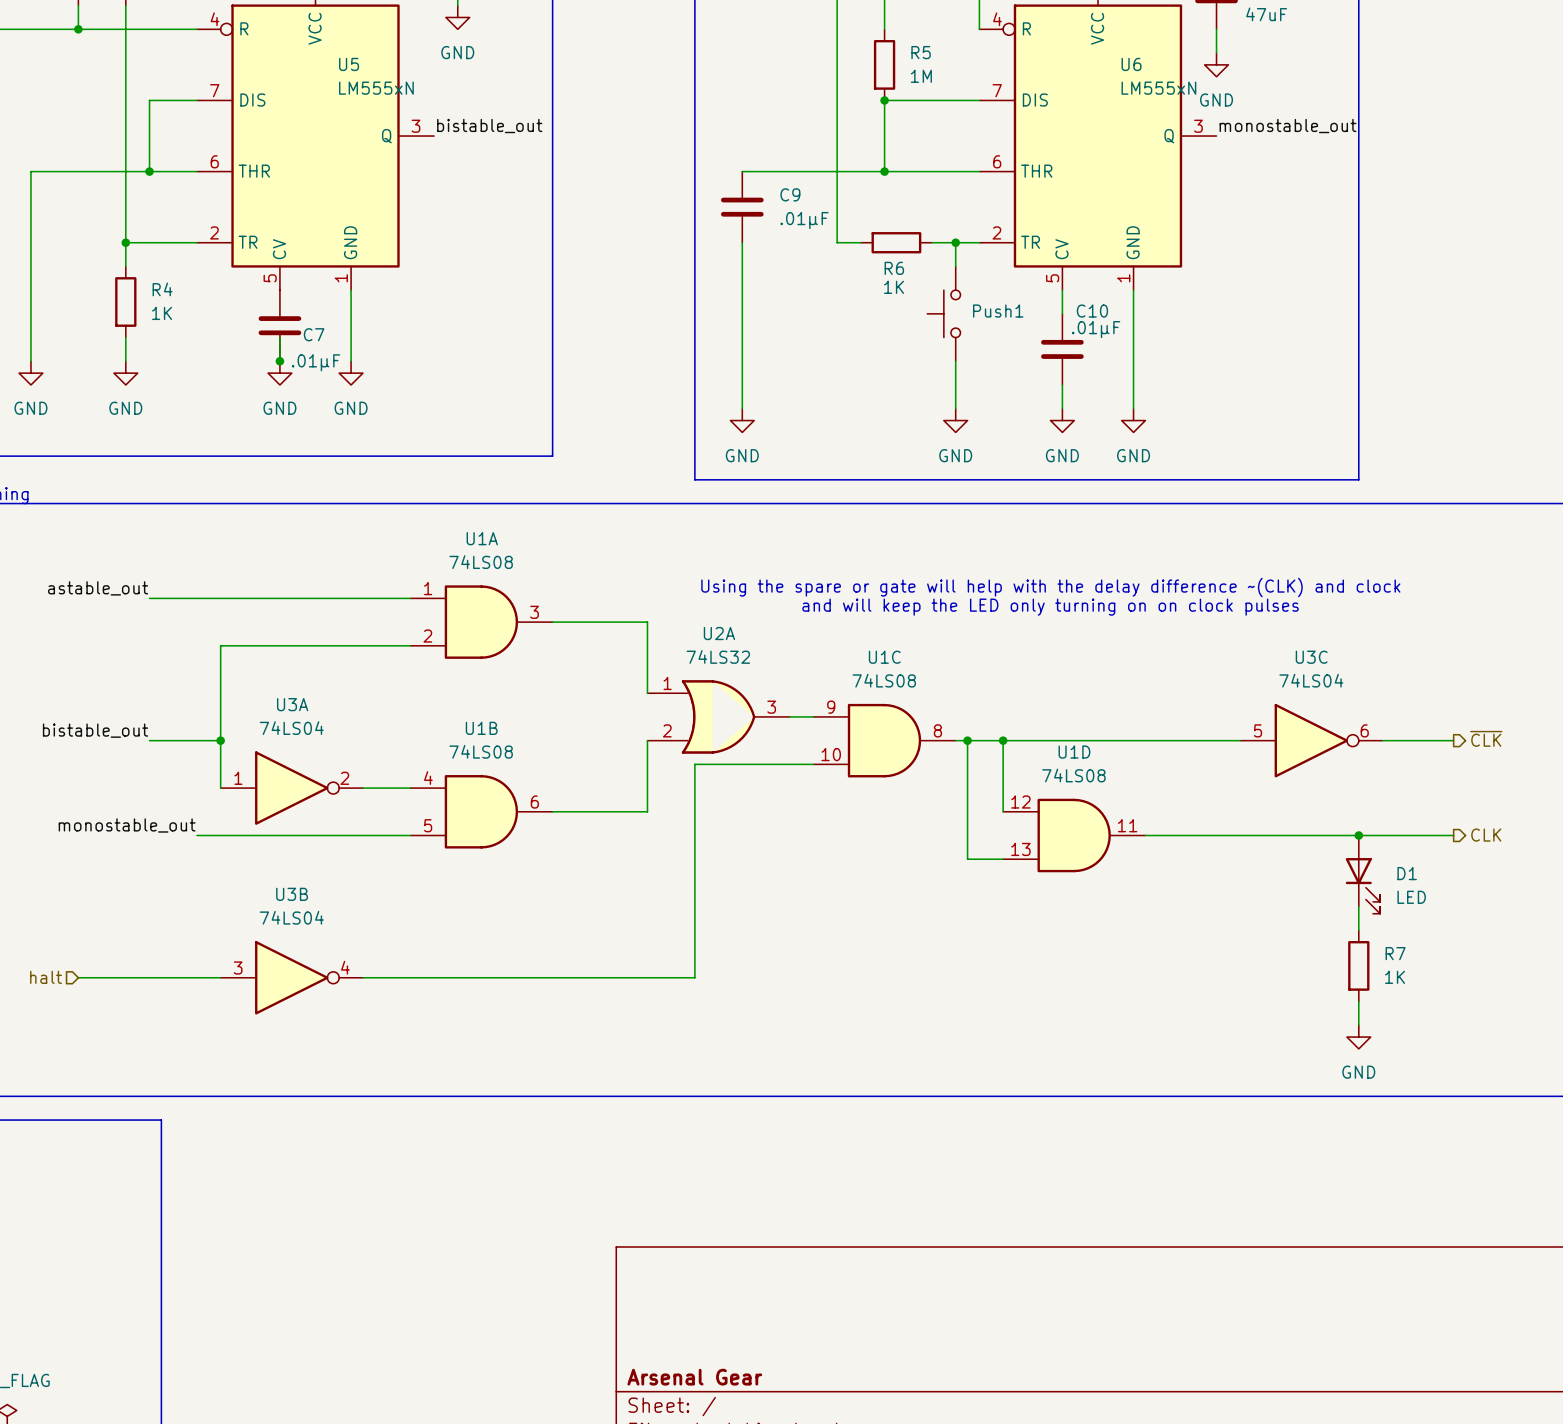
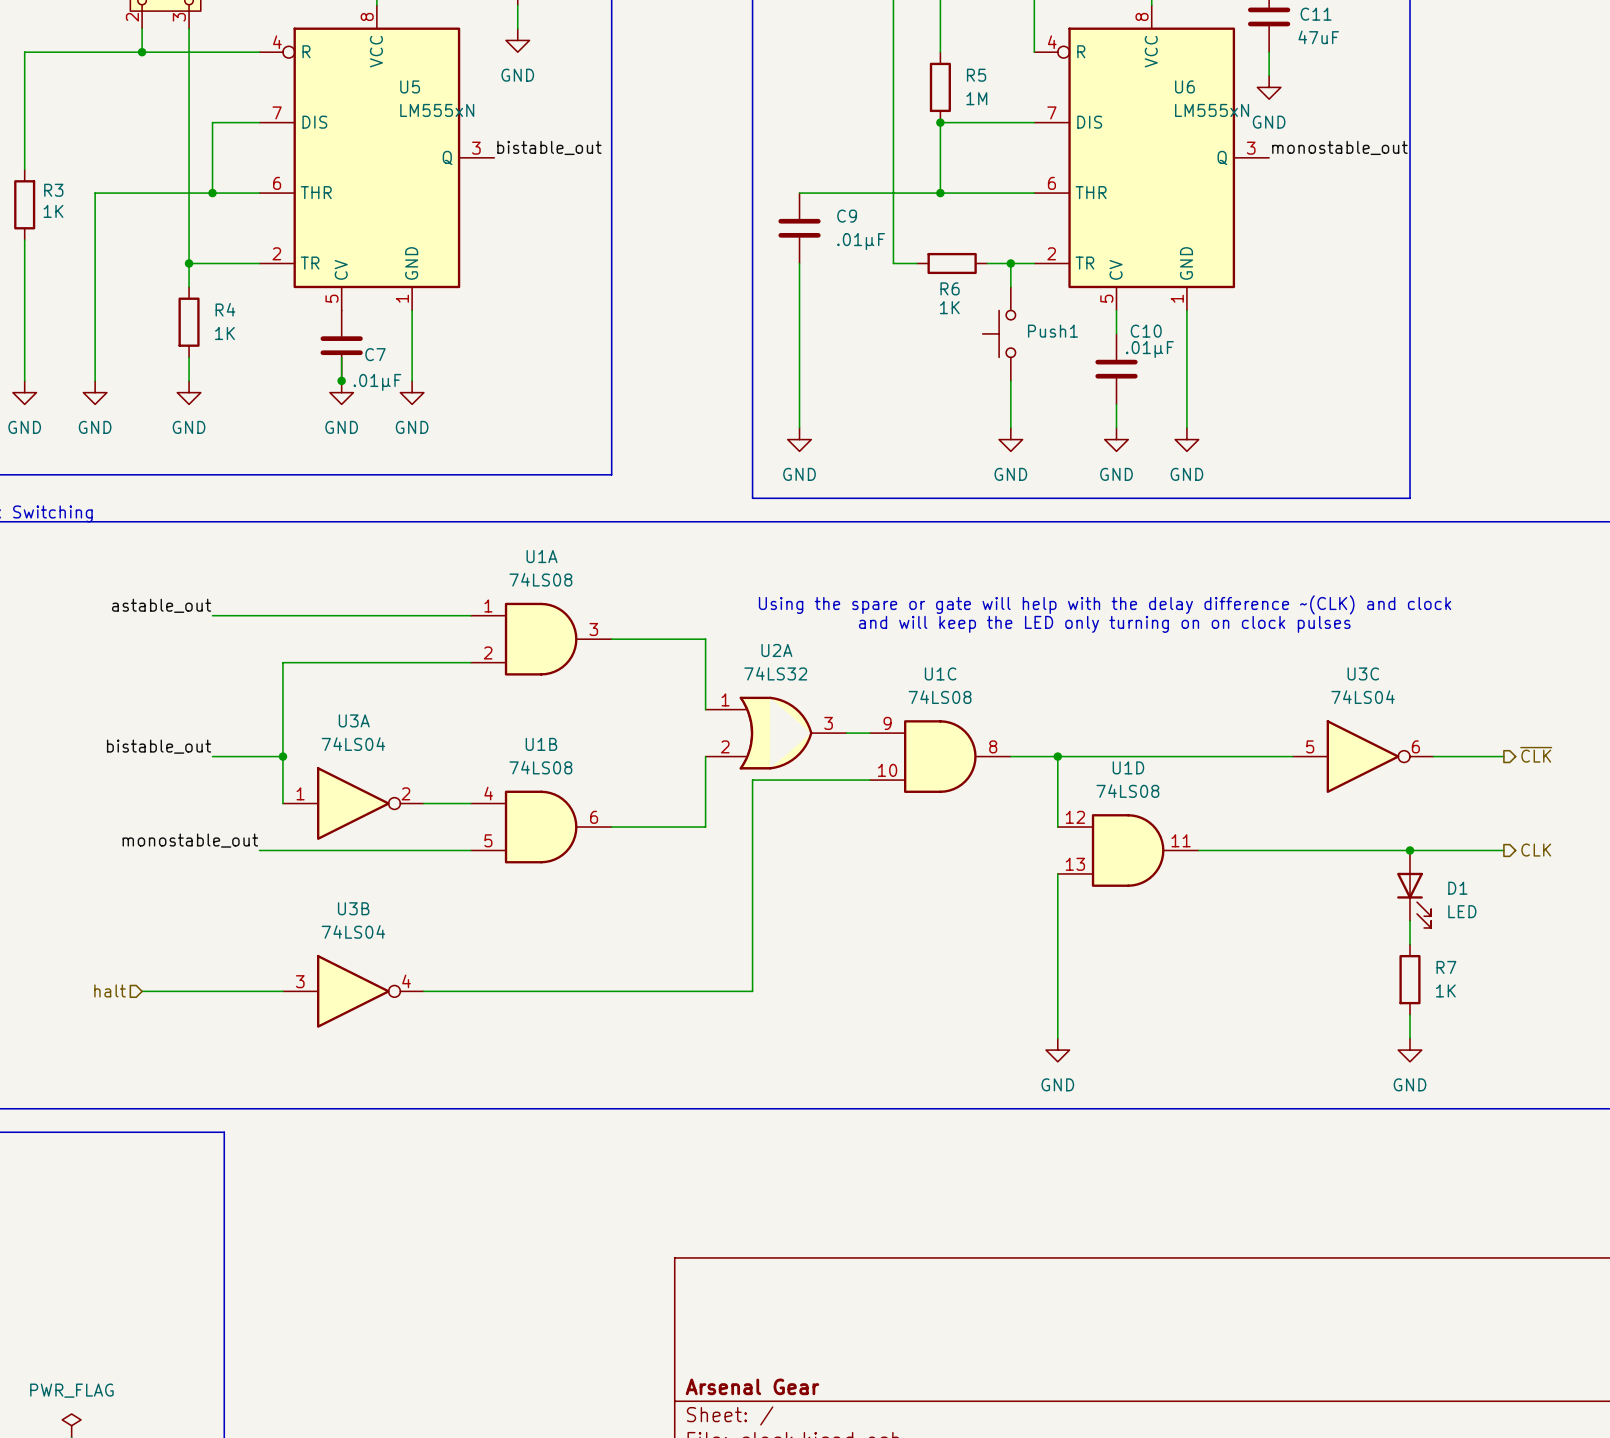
wire: (967, 740) (967, 859) (1003, 859) -> (1057, 1038) (1057, 873)
junction: (967, 740) -> none
power symbol: none -> GND (1057, 1050)

